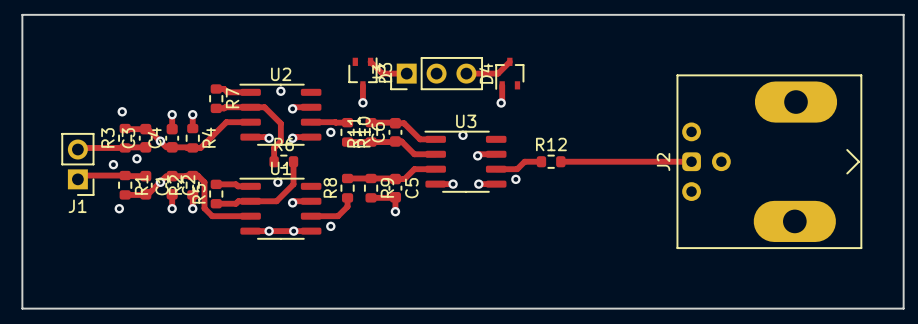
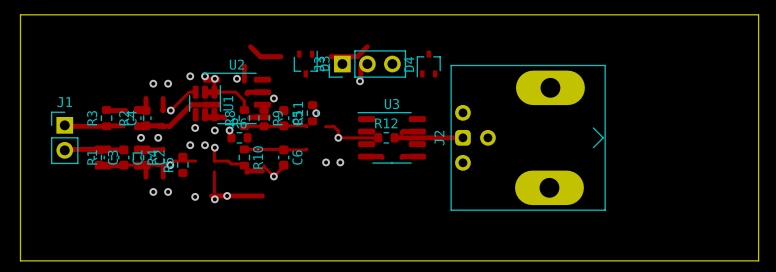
track: (370, 61) (382, 73) (406, 73) -> (250, 46) (260, 56) (280, 56)
track: (509, 61) (498, 73) (466, 73) -> (367, 46) (357, 56) (330, 56)
track: none -> (244, 66) (244, 81)
track: (362, 85) (363, 102) -> none
track: (502, 85) (501, 102) -> (360, 66) (360, 81)
track: (216, 88) (224, 88) (227, 92) (250, 92) -> none
via: none -> (190, 76)
via: none -> (205, 76)
track: none -> (214, 78) (214, 92) (235, 92) (244, 100) (244, 110)
via: none -> (214, 78)
via: none -> (360, 81)
via: none -> (153, 83)
via: none -> (168, 83)
R7: (216, 98) -> none
via: (362, 102) -> none
via: (501, 102) -> none
track: none -> (195, 92) (189, 92) (170, 110)
track: (216, 108) (264, 107) (280, 123) (280, 141) (274, 147) (274, 161) -> none
via: (292, 108) -> none
via: (122, 111) -> none
via: (172, 114) -> none
via: (192, 114) -> none
via: none -> (273, 98)
track: (311, 122) (347, 122) -> none
track: (371, 122) (403, 123) (420, 139) (435, 139) -> none
track: (148, 129) (166, 147) -> none
via: none -> (170, 110)
via: (330, 132) -> none
R10 position: (347, 132) -> (244, 157)
via: none -> (316, 113)
C6 name position: C6 (378, 132) -> C6 (297, 157)
C6 position: (395, 132) -> (283, 157)
via: (463, 135) -> none
C3 name position: C3 (128, 138) -> C3 (112, 157)
C3 position: (145, 138) -> (99, 157)
R4 position: (192, 138) -> (138, 157)
via: (269, 138) -> none
via: (292, 138) -> none
via: (160, 141) -> none
track: (347, 142) (401, 141) (414, 154) (435, 154) -> none
track: none -> (306, 125) (244, 126)
track: none -> (325, 126) (334, 126) (338, 130) (338, 137)
via: none -> (195, 127)
via: none -> (214, 130)
via: none -> (229, 130)
via: (477, 155) -> none
via: (136, 158) -> none
via: none -> (141, 137)
via: none -> (158, 137)
track: (293, 161) (293, 184) (276, 201) (238, 201) (235, 203) (216, 203) -> none
track: none -> (337, 137) (378, 137)
via: none -> (338, 137)
track: (524, 161) (517, 169) (496, 169) -> (441, 137) (394, 137)
R12 position: (551, 161) -> (386, 137)
track: (560, 161) (688, 161) (691, 164) -> none
J2 position: (769, 161) -> (528, 137)
J1 rotation: 0° (77, 164) -> 180° (64, 137)
via: (113, 164) -> none
U1 name position: U1 (281, 168) -> U1 (228, 103)
track: (435, 169) (414, 169) (404, 179) (347, 178) -> none
via: none -> (190, 145)
via: none -> (205, 145)
track: none -> (214, 147) (214, 161) (244, 163)
via: none -> (214, 147)
track: (186, 175) (197, 175) (204, 182) (204, 208) (212, 216) (250, 216) -> none
track: none -> (306, 149) (244, 149)
track: (166, 176) (148, 194) -> (195, 161) (174, 161) (170, 165) (125, 165)
U1 footprint: [239, 177, 322, 240] -> [189, 85, 221, 122]
via: (515, 179) -> none
via: (160, 182) -> none
via: (277, 182) -> none
R1 name position: R1 (141, 184) -> R1 (92, 157)
track: (216, 184) (250, 186) -> none
via: (453, 184) -> none
via: (478, 184) -> none
R2 position: (192, 185) -> (138, 118)
R8 position: (347, 188) -> (244, 118)
R9 position: (371, 188) -> (264, 118)
C5 position: (395, 188) -> (283, 118)
via: none -> (326, 162)
via: none -> (340, 162)
via: none -> (170, 165)
track: none -> (264, 165) (273, 176) (283, 165)
track: (347, 197) (347, 206) (338, 216) (311, 216) -> none
track: (371, 197) (395, 197) (395, 211) -> none
track: none -> (214, 171) (214, 191)
via: (292, 202) -> none
via: none -> (273, 176)
via: (119, 208) -> none
via: (172, 208) -> none
via: (192, 208) -> none
via: (395, 211) -> none
via: none -> (153, 191)
via: none -> (168, 191)
via: (330, 226) -> none
via: (293, 231) -> none
via: none -> (195, 196)
via: none -> (214, 199)

